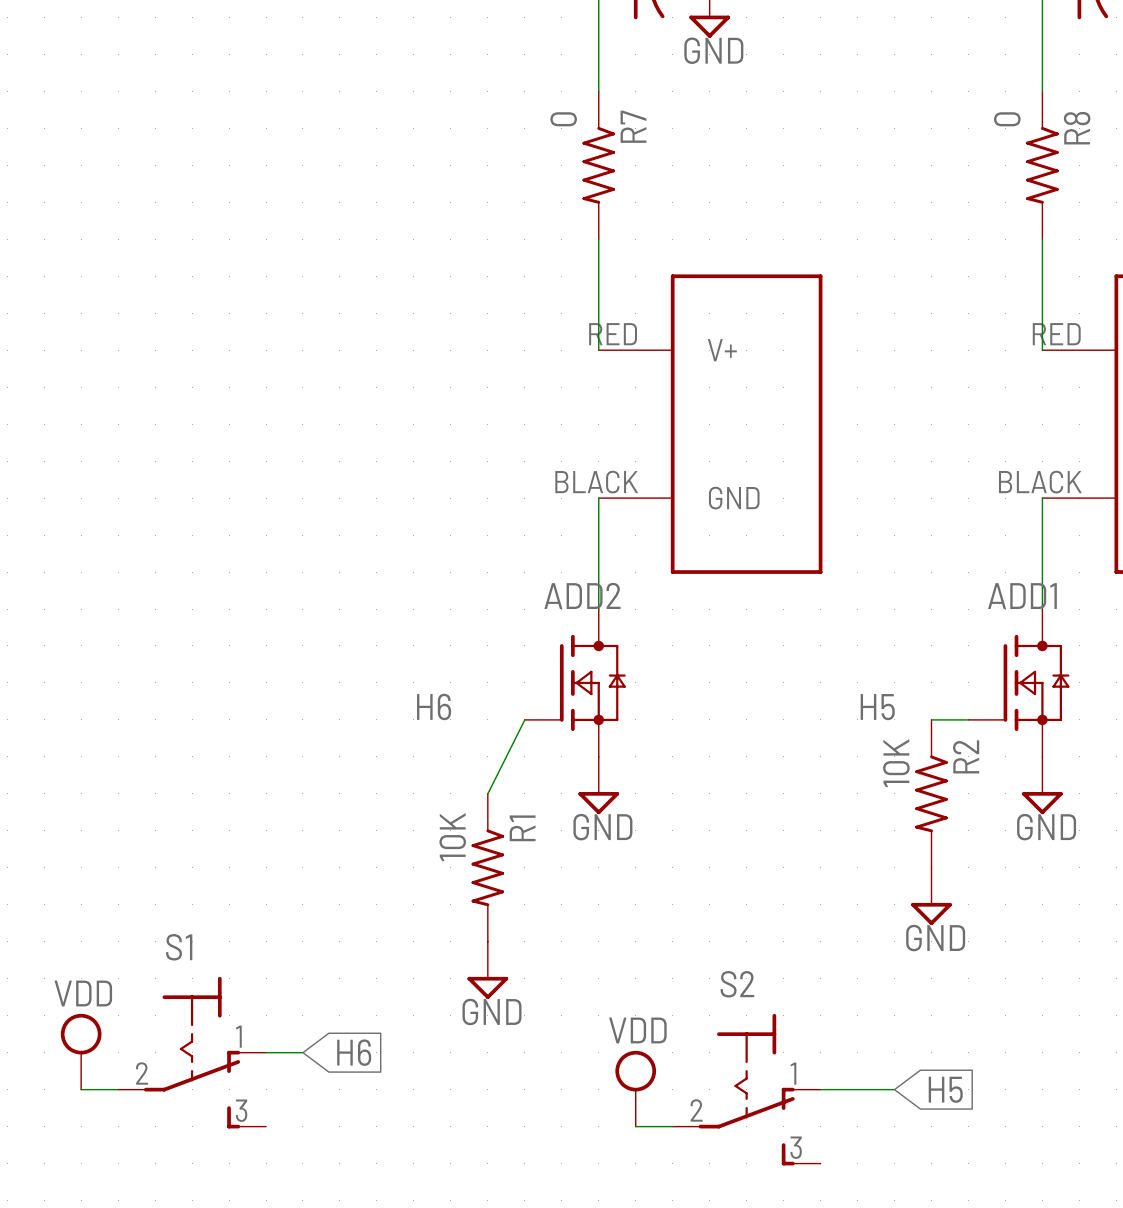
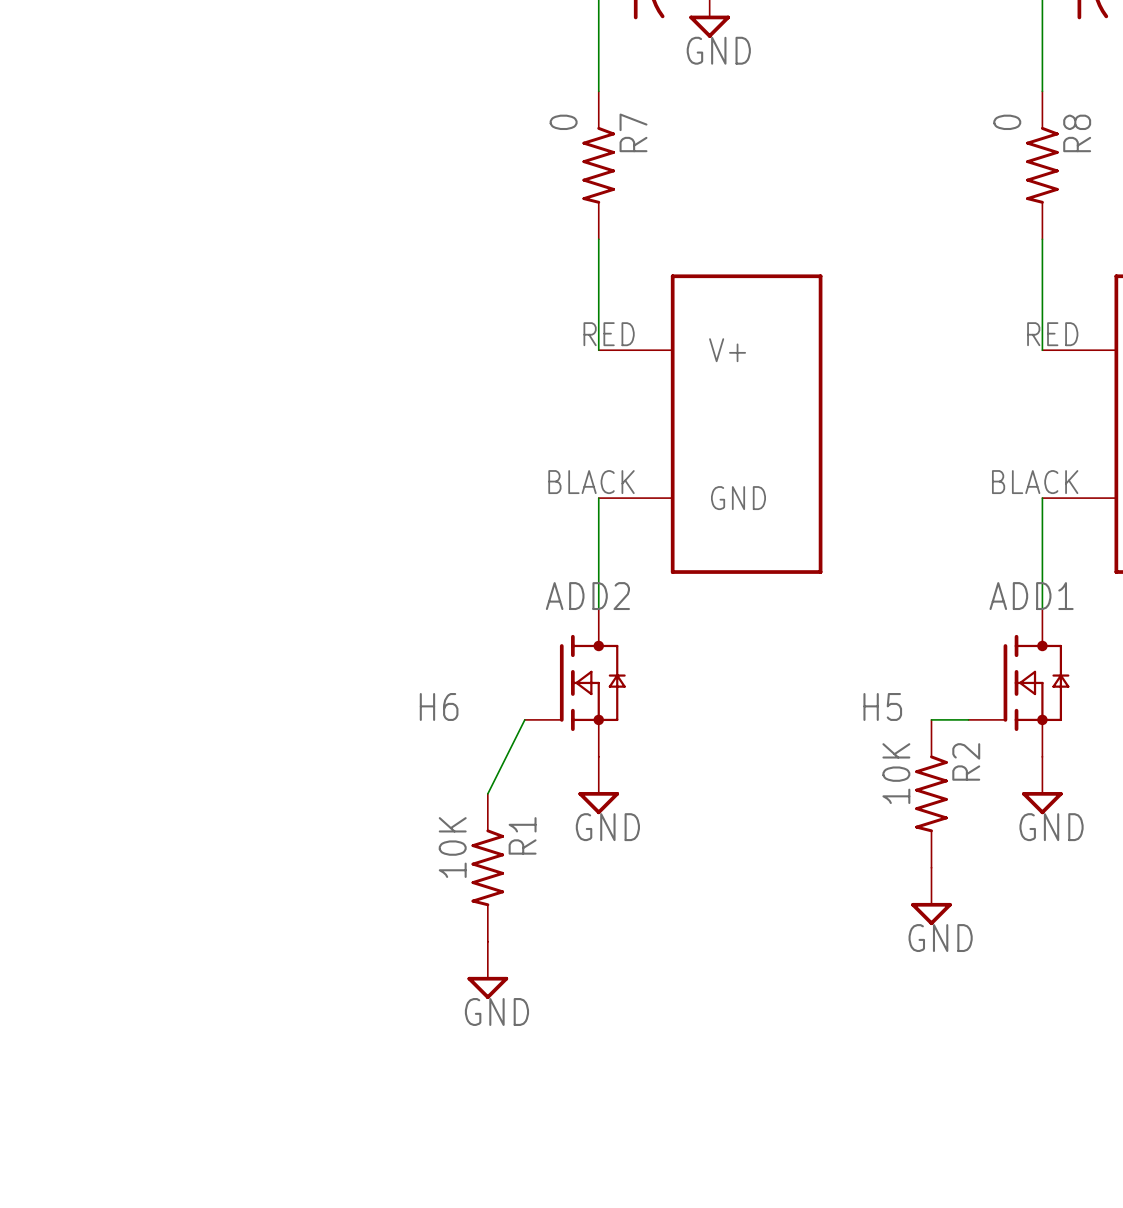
power symbol: VDD (81, 1051) -> none
S1: (192, 1052) -> none
wire: (266, 1052) (302, 1052) -> none
global label: H6 (354, 1052) -> none
power symbol: VDD (635, 1088) -> none
wire: (81, 1089) (118, 1089) -> none
S2: (746, 1089) -> none
wire: (820, 1089) (894, 1089) -> none
global label: H5 (945, 1089) -> none
wire: (635, 1126) (672, 1126) -> none

